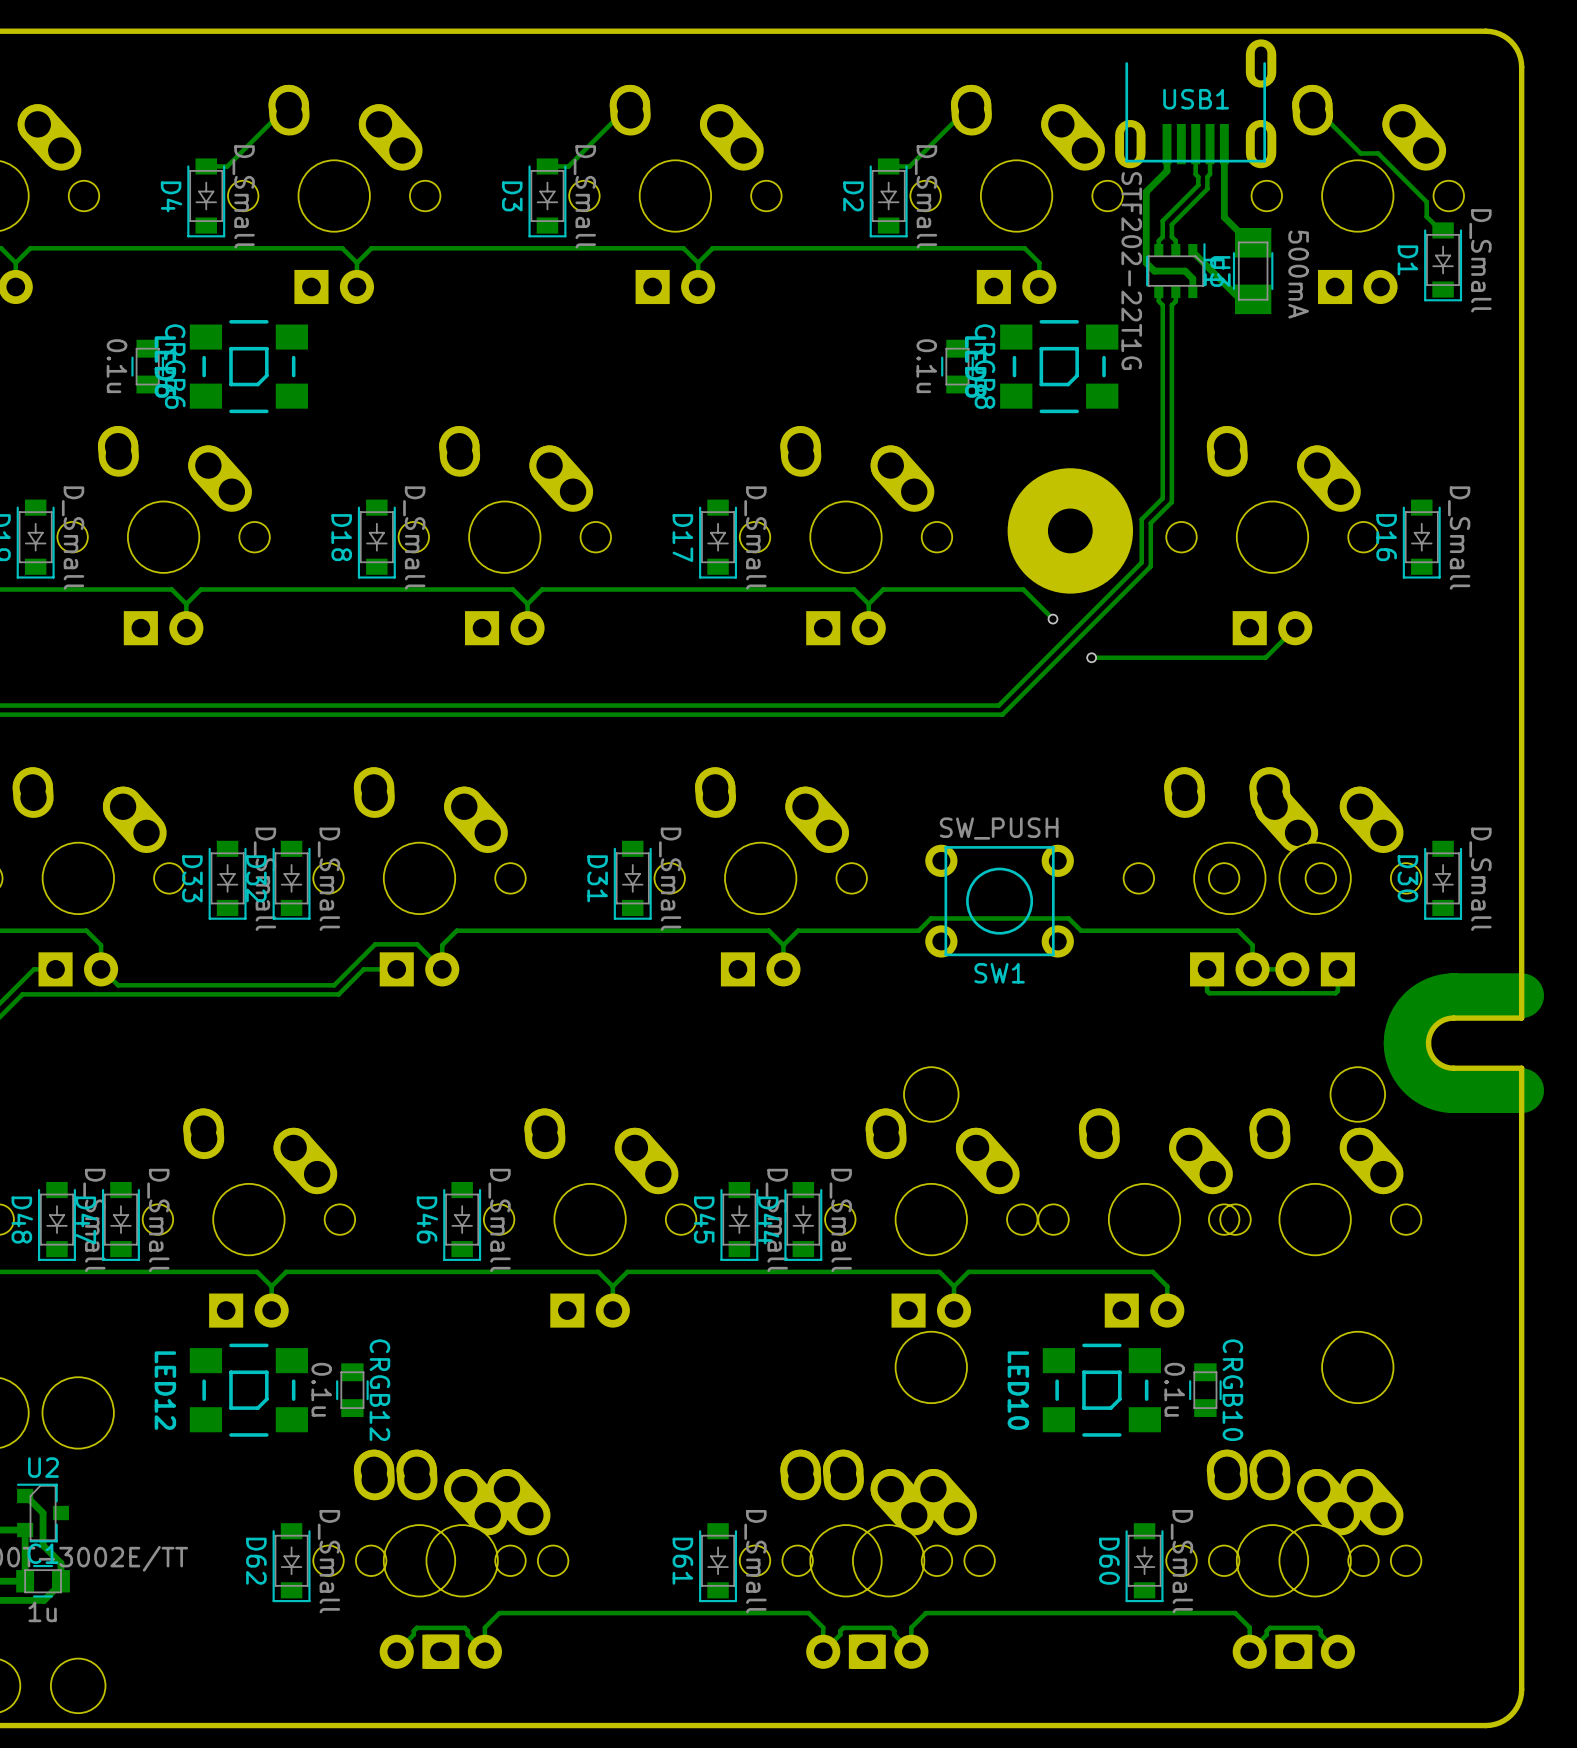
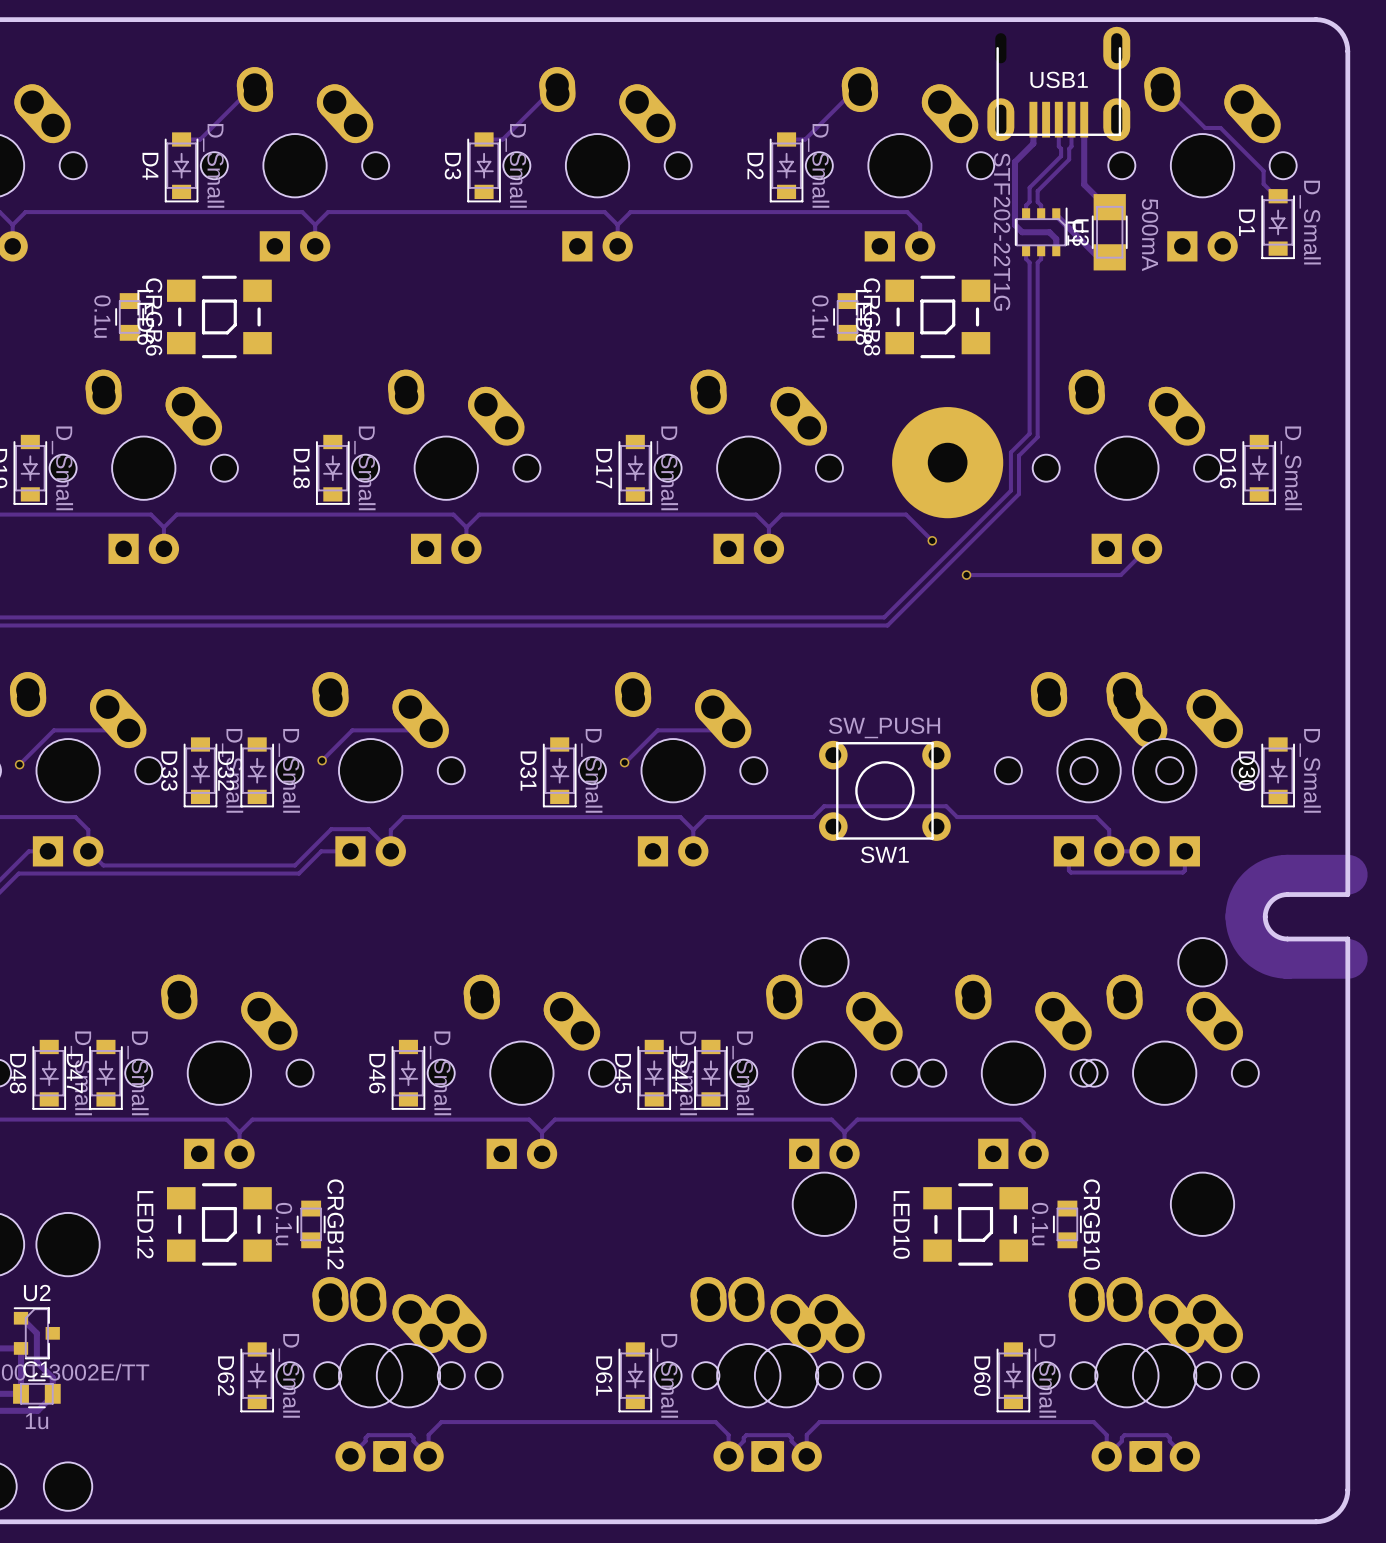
track: none -> (128, 730) (53, 730) (19, 764)
track: none -> (431, 730) (352, 730) (322, 760)
track: none -> (733, 730) (657, 730) (624, 762)
via: none -> (322, 760)
via: none -> (624, 762)
via: none -> (19, 764)

